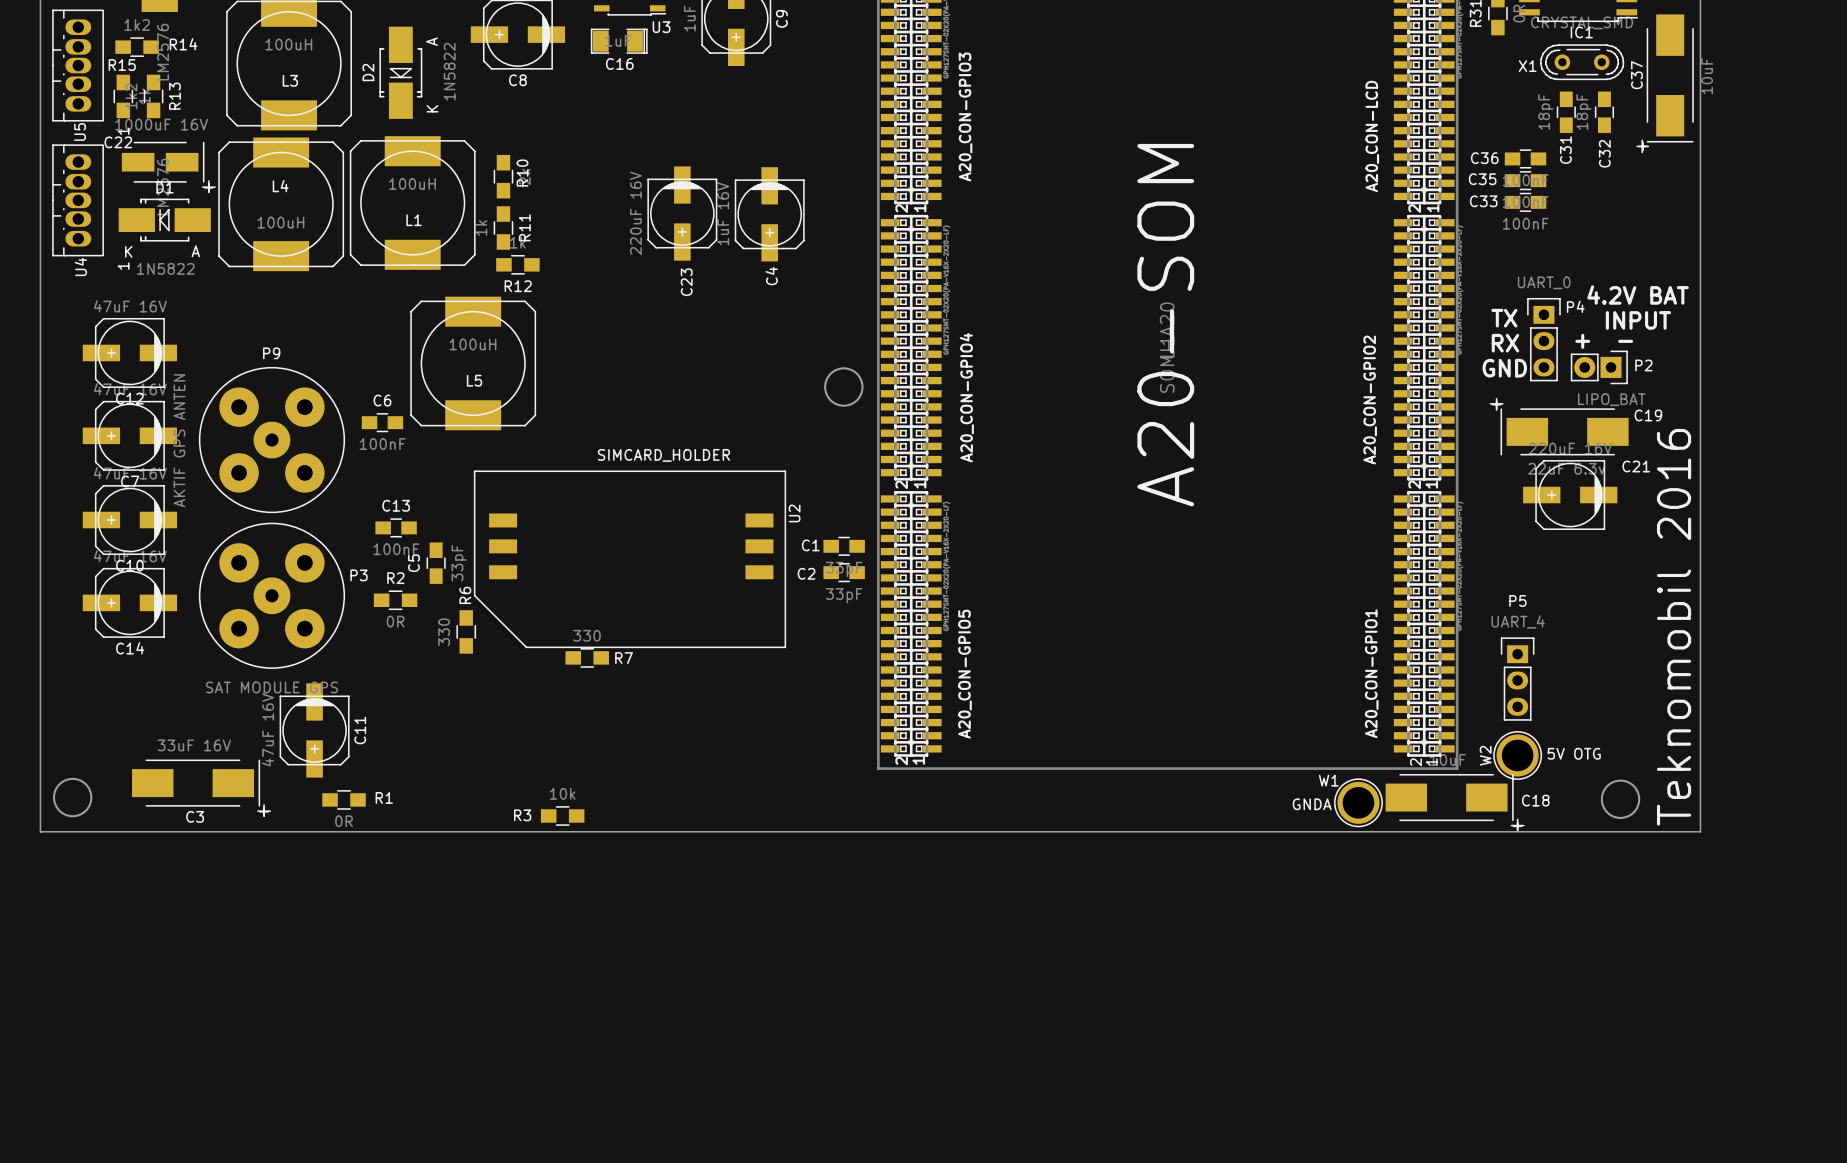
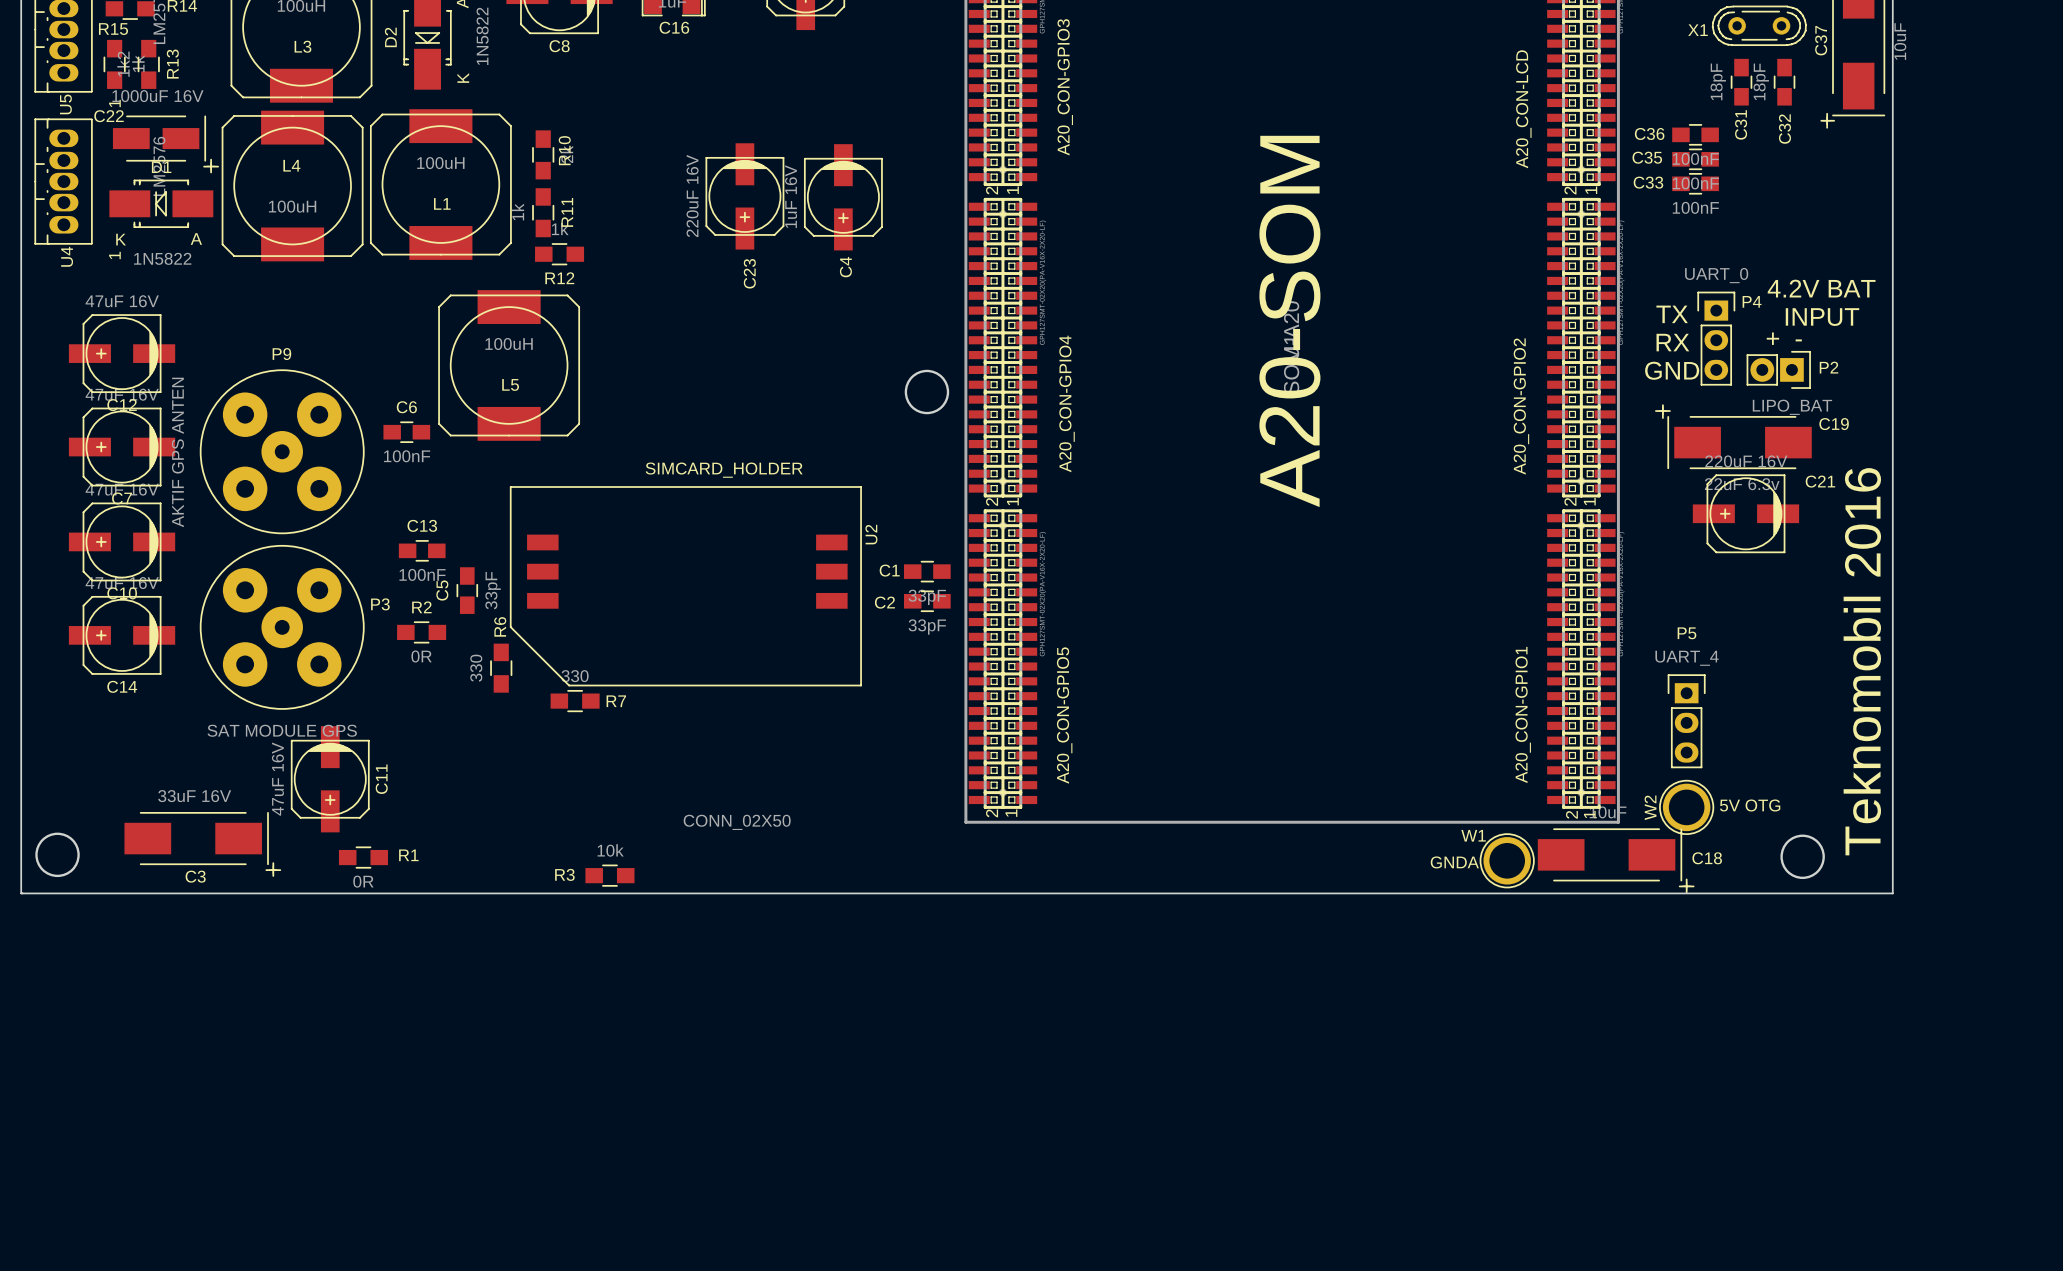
R7 position: (587, 657) -> (575, 701)
part: none -> CONN_02X50 (737, 822)

